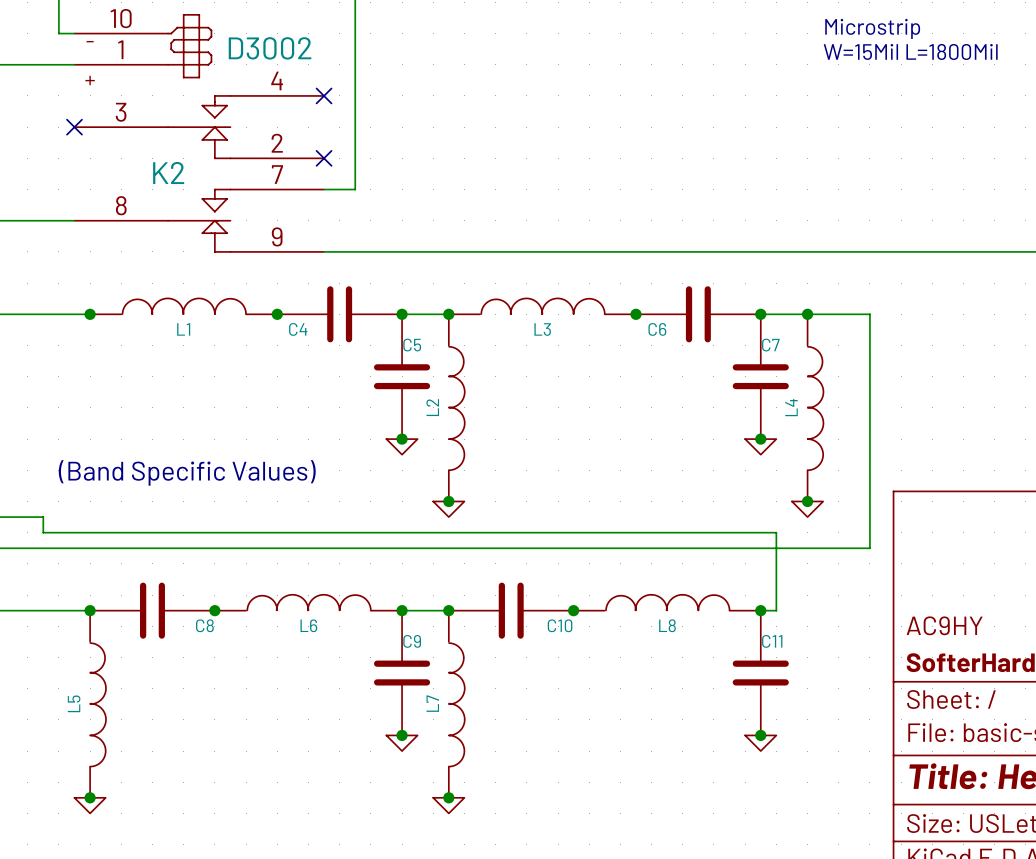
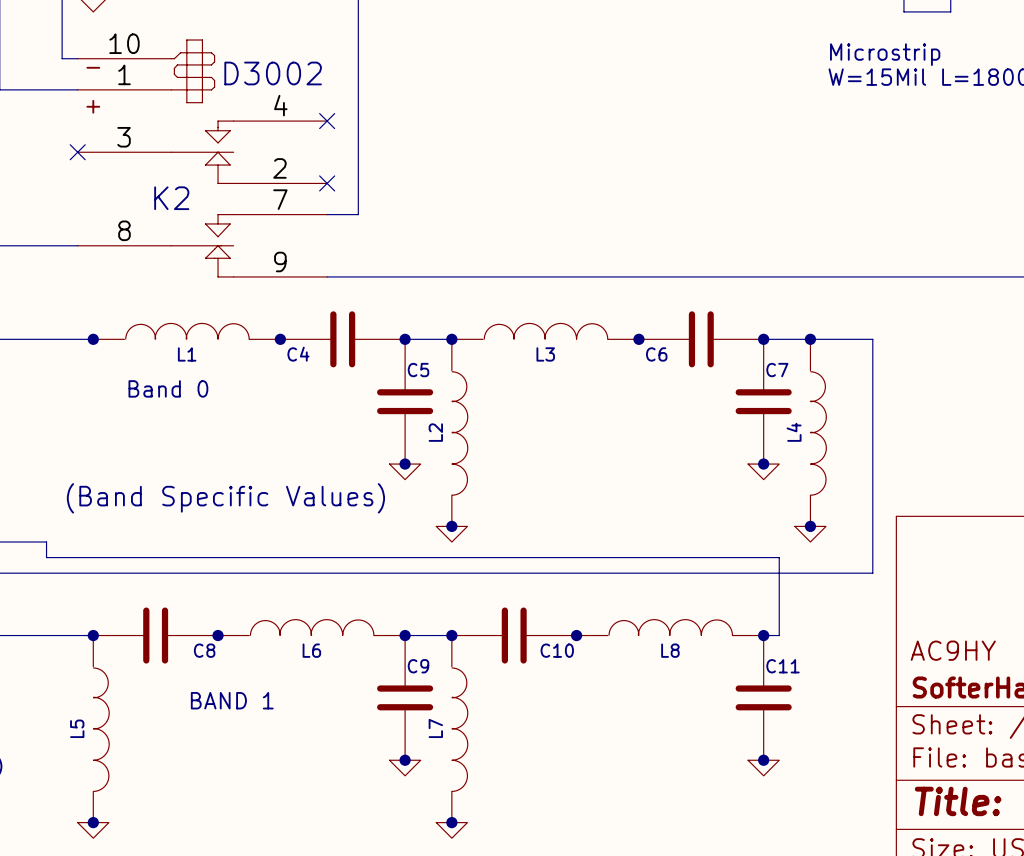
text: none -> Band 0 (168, 388)
text: none -> BAND 1 (232, 700)

